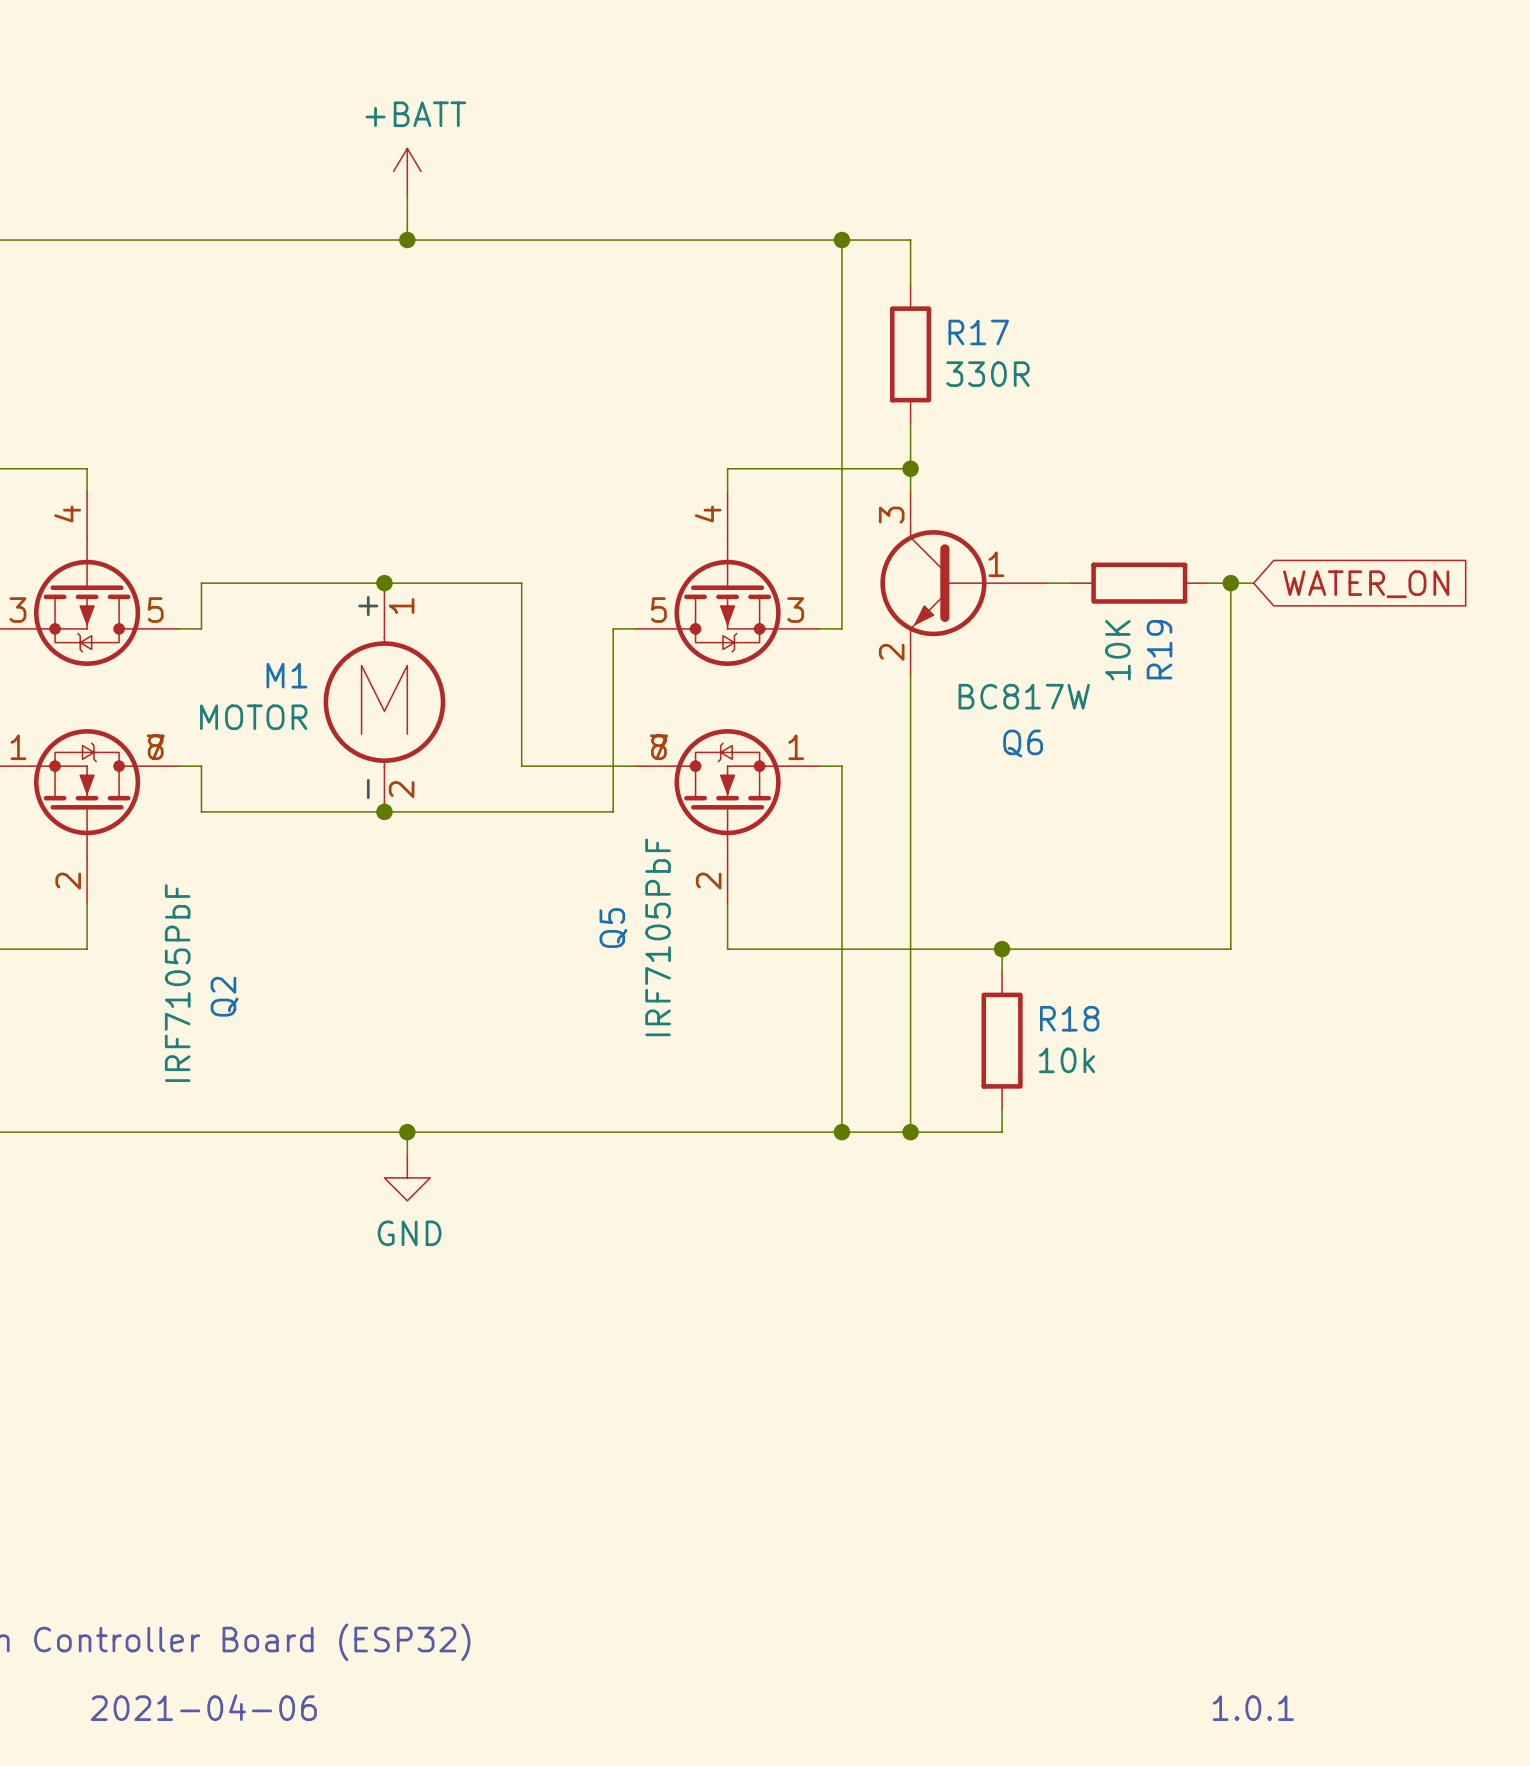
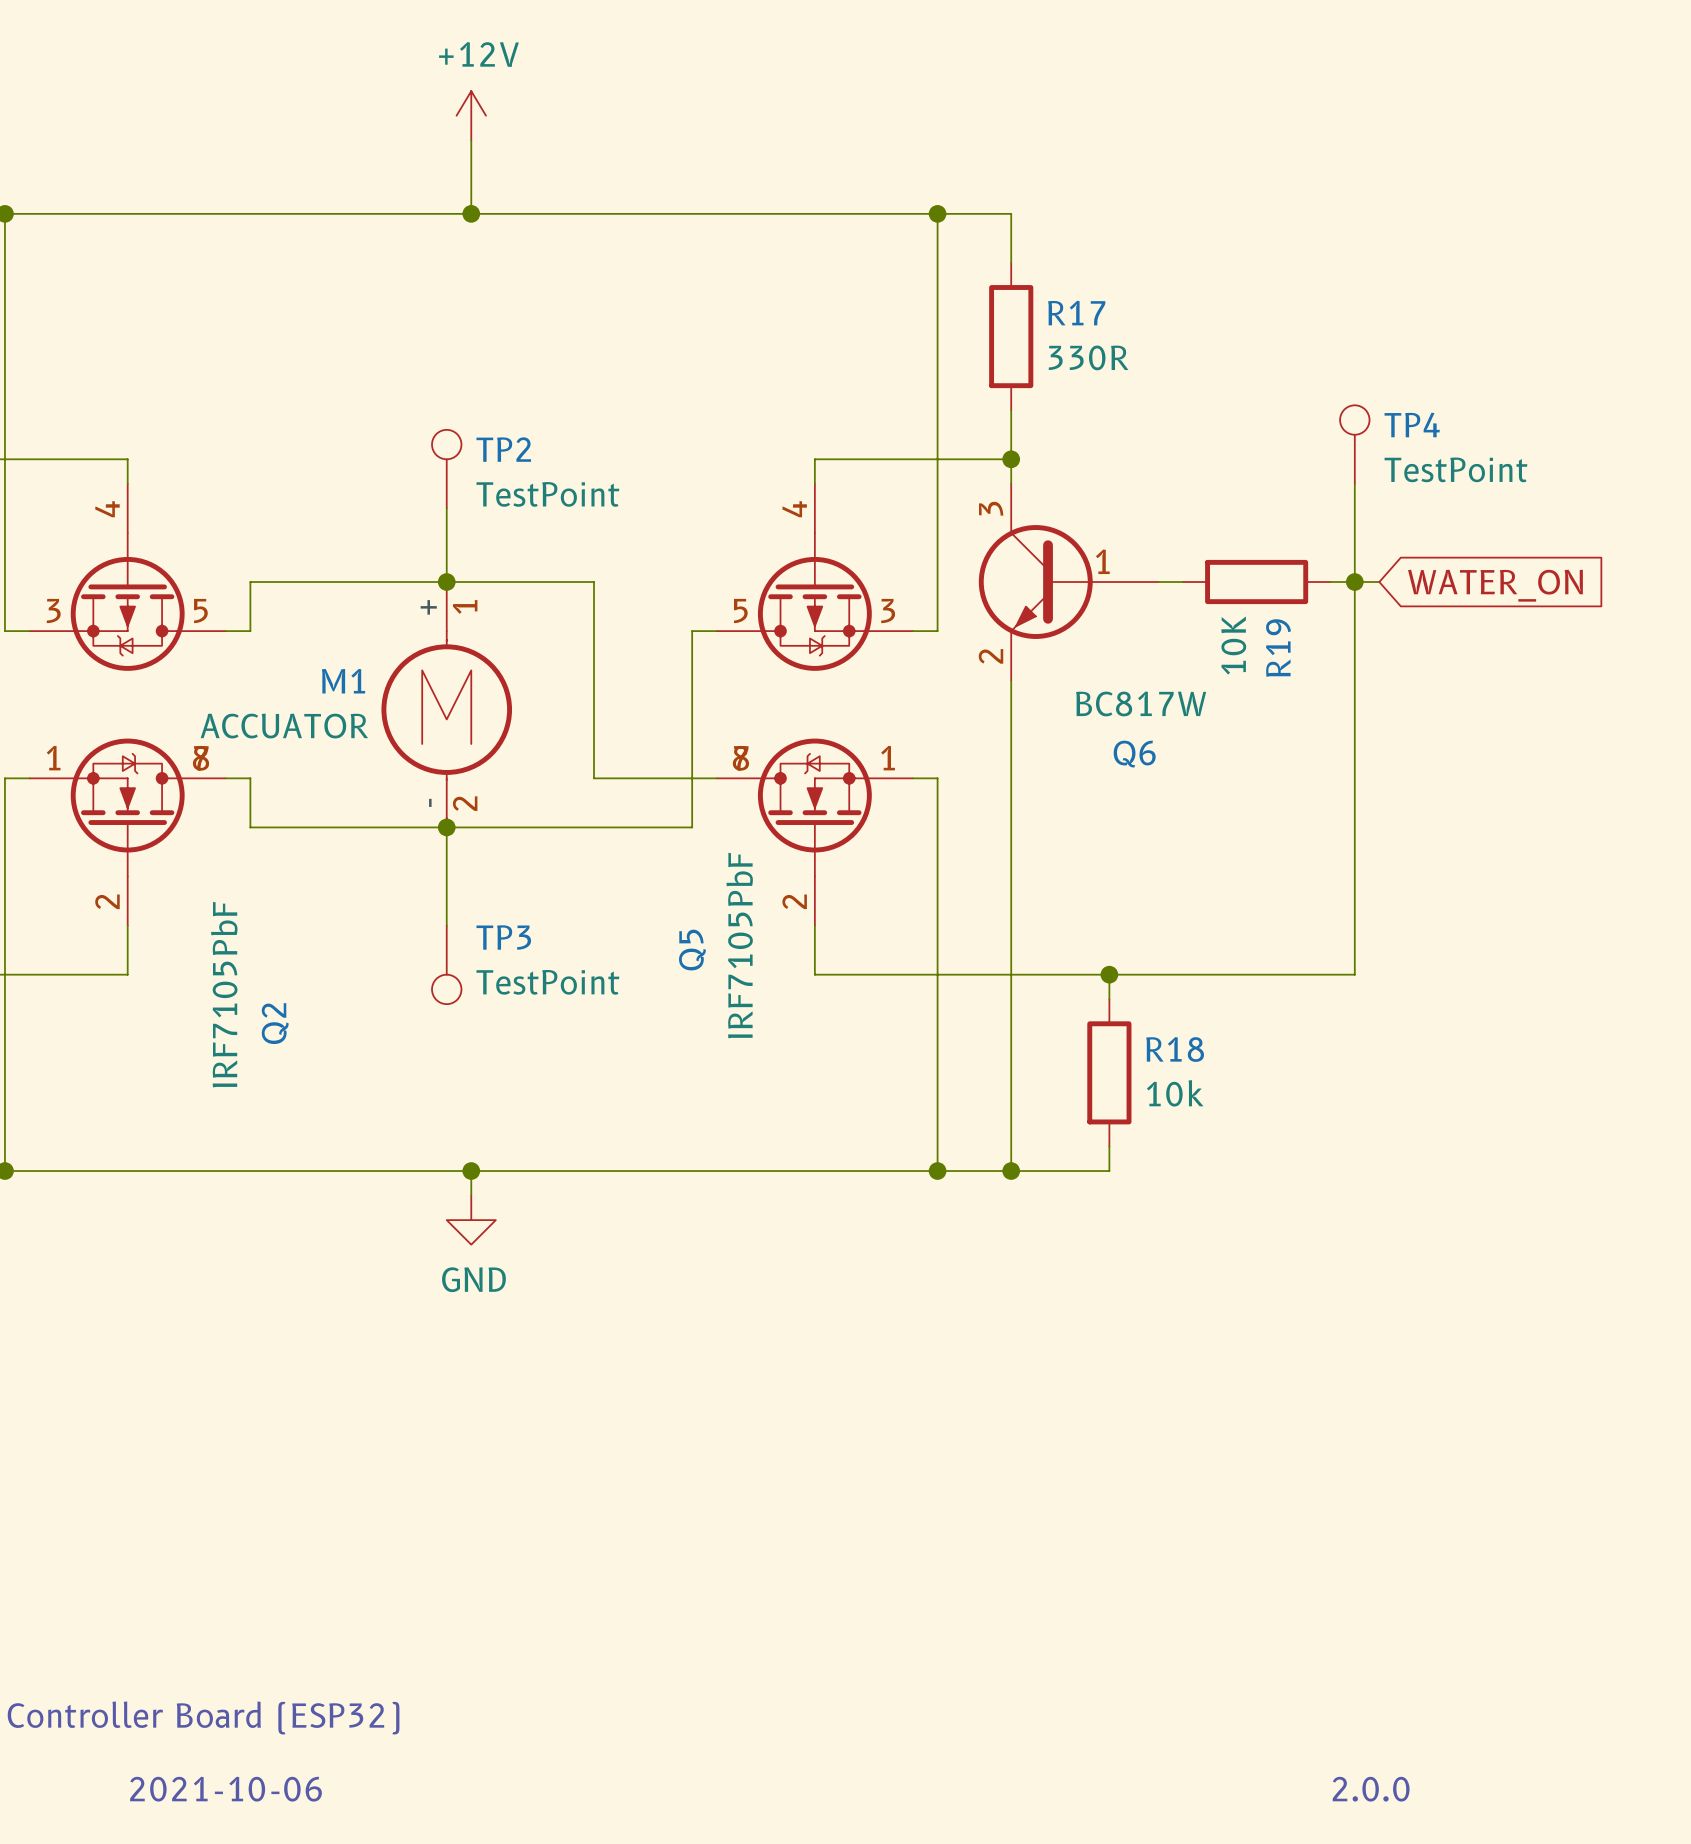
power symbol: none -> +12V (471, 115)
power symbol: +BATT (407, 171) -> none
TP4: none -> TestPoint (1354, 444)
TP2: none -> TestPoint (446, 469)
wire: none -> (1354, 483) (1354, 582)
wire: none -> (446, 508) (446, 582)
M1 value: MOTOR (253, 717) -> ACCUATOR (284, 726)
wire: none -> (446, 827) (446, 925)
TP3: none -> TestPoint (446, 964)
text: 2021-04-06 (203, 1707) -> 2021-10-06 (226, 1789)
text: 1.0.1 (1253, 1708) -> 2.0.0 (1371, 1789)

